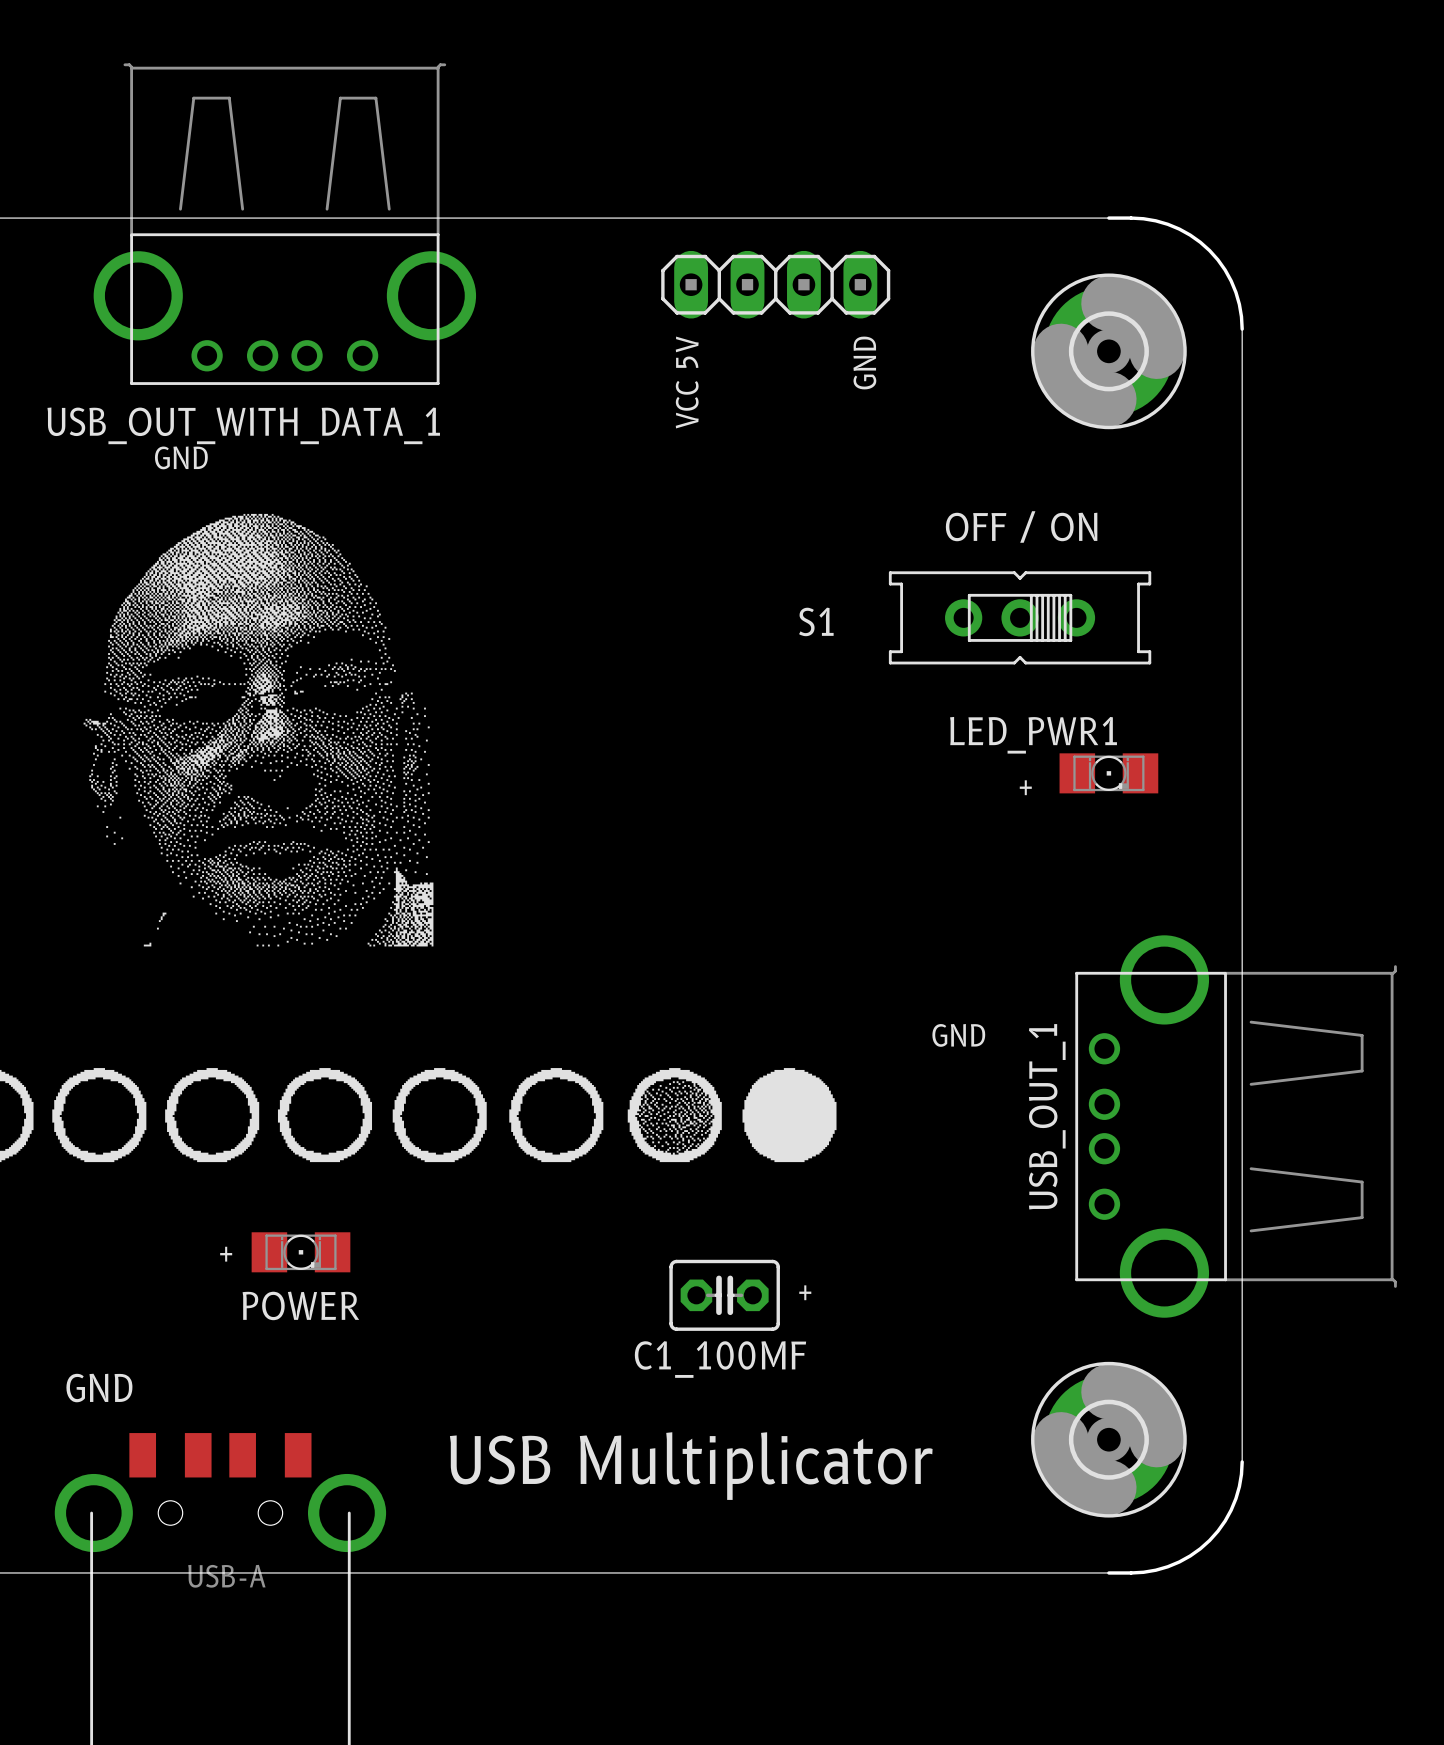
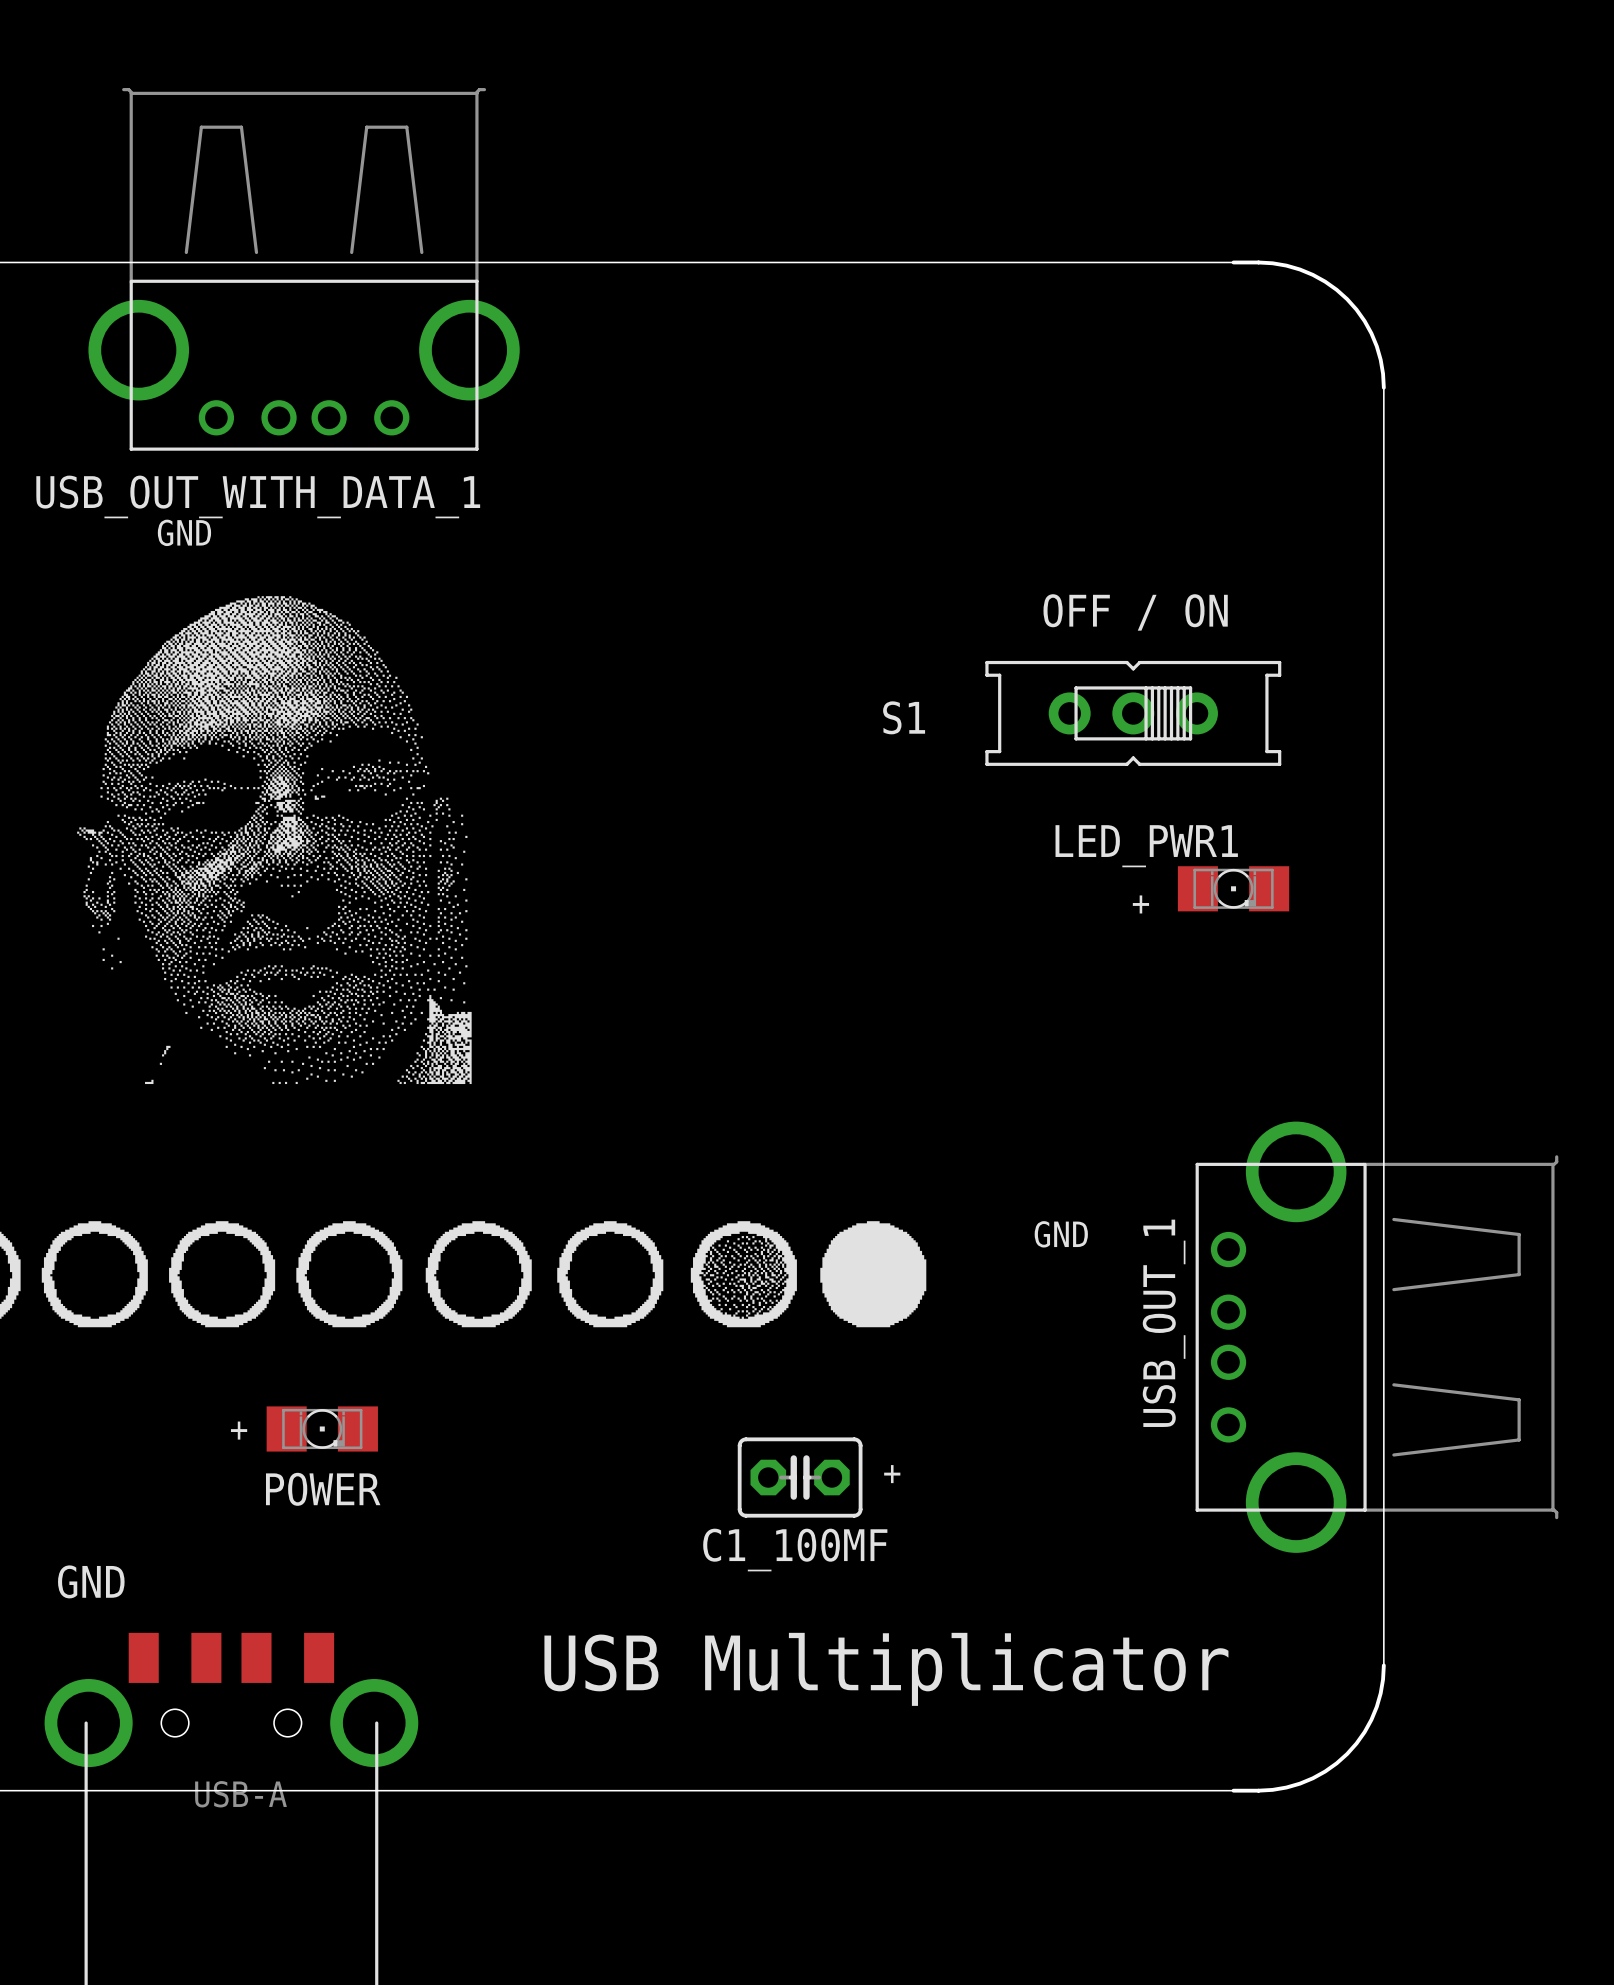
part: (775, 284) -> none
part: (1108, 351) -> none
text: GND (864, 362) -> none
text: VCC 5V (687, 382) -> none
text position: GND (958, 1035) -> GND (1061, 1234)
USB_OUT_1 position: (1236, 1126) -> (1376, 1337)
part: (1108, 1439) -> none
text position: USB Multiplicator (691, 1466) -> USB Multiplicator (886, 1669)

